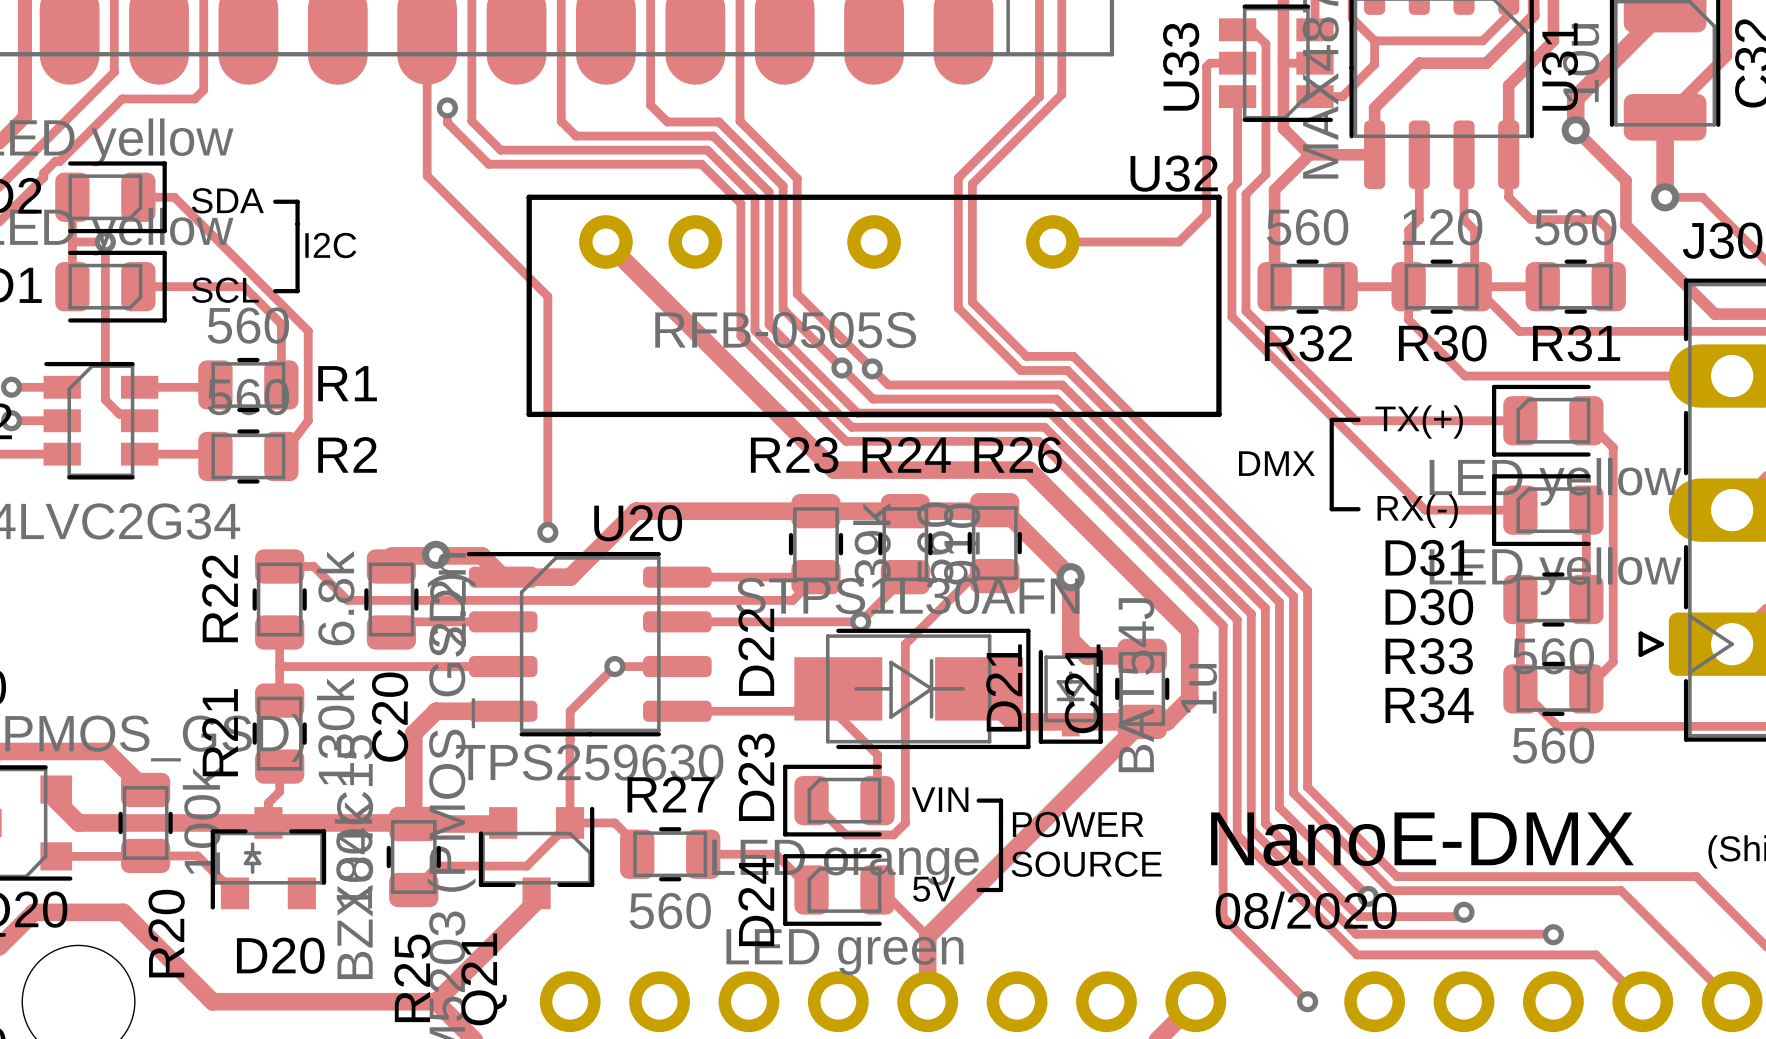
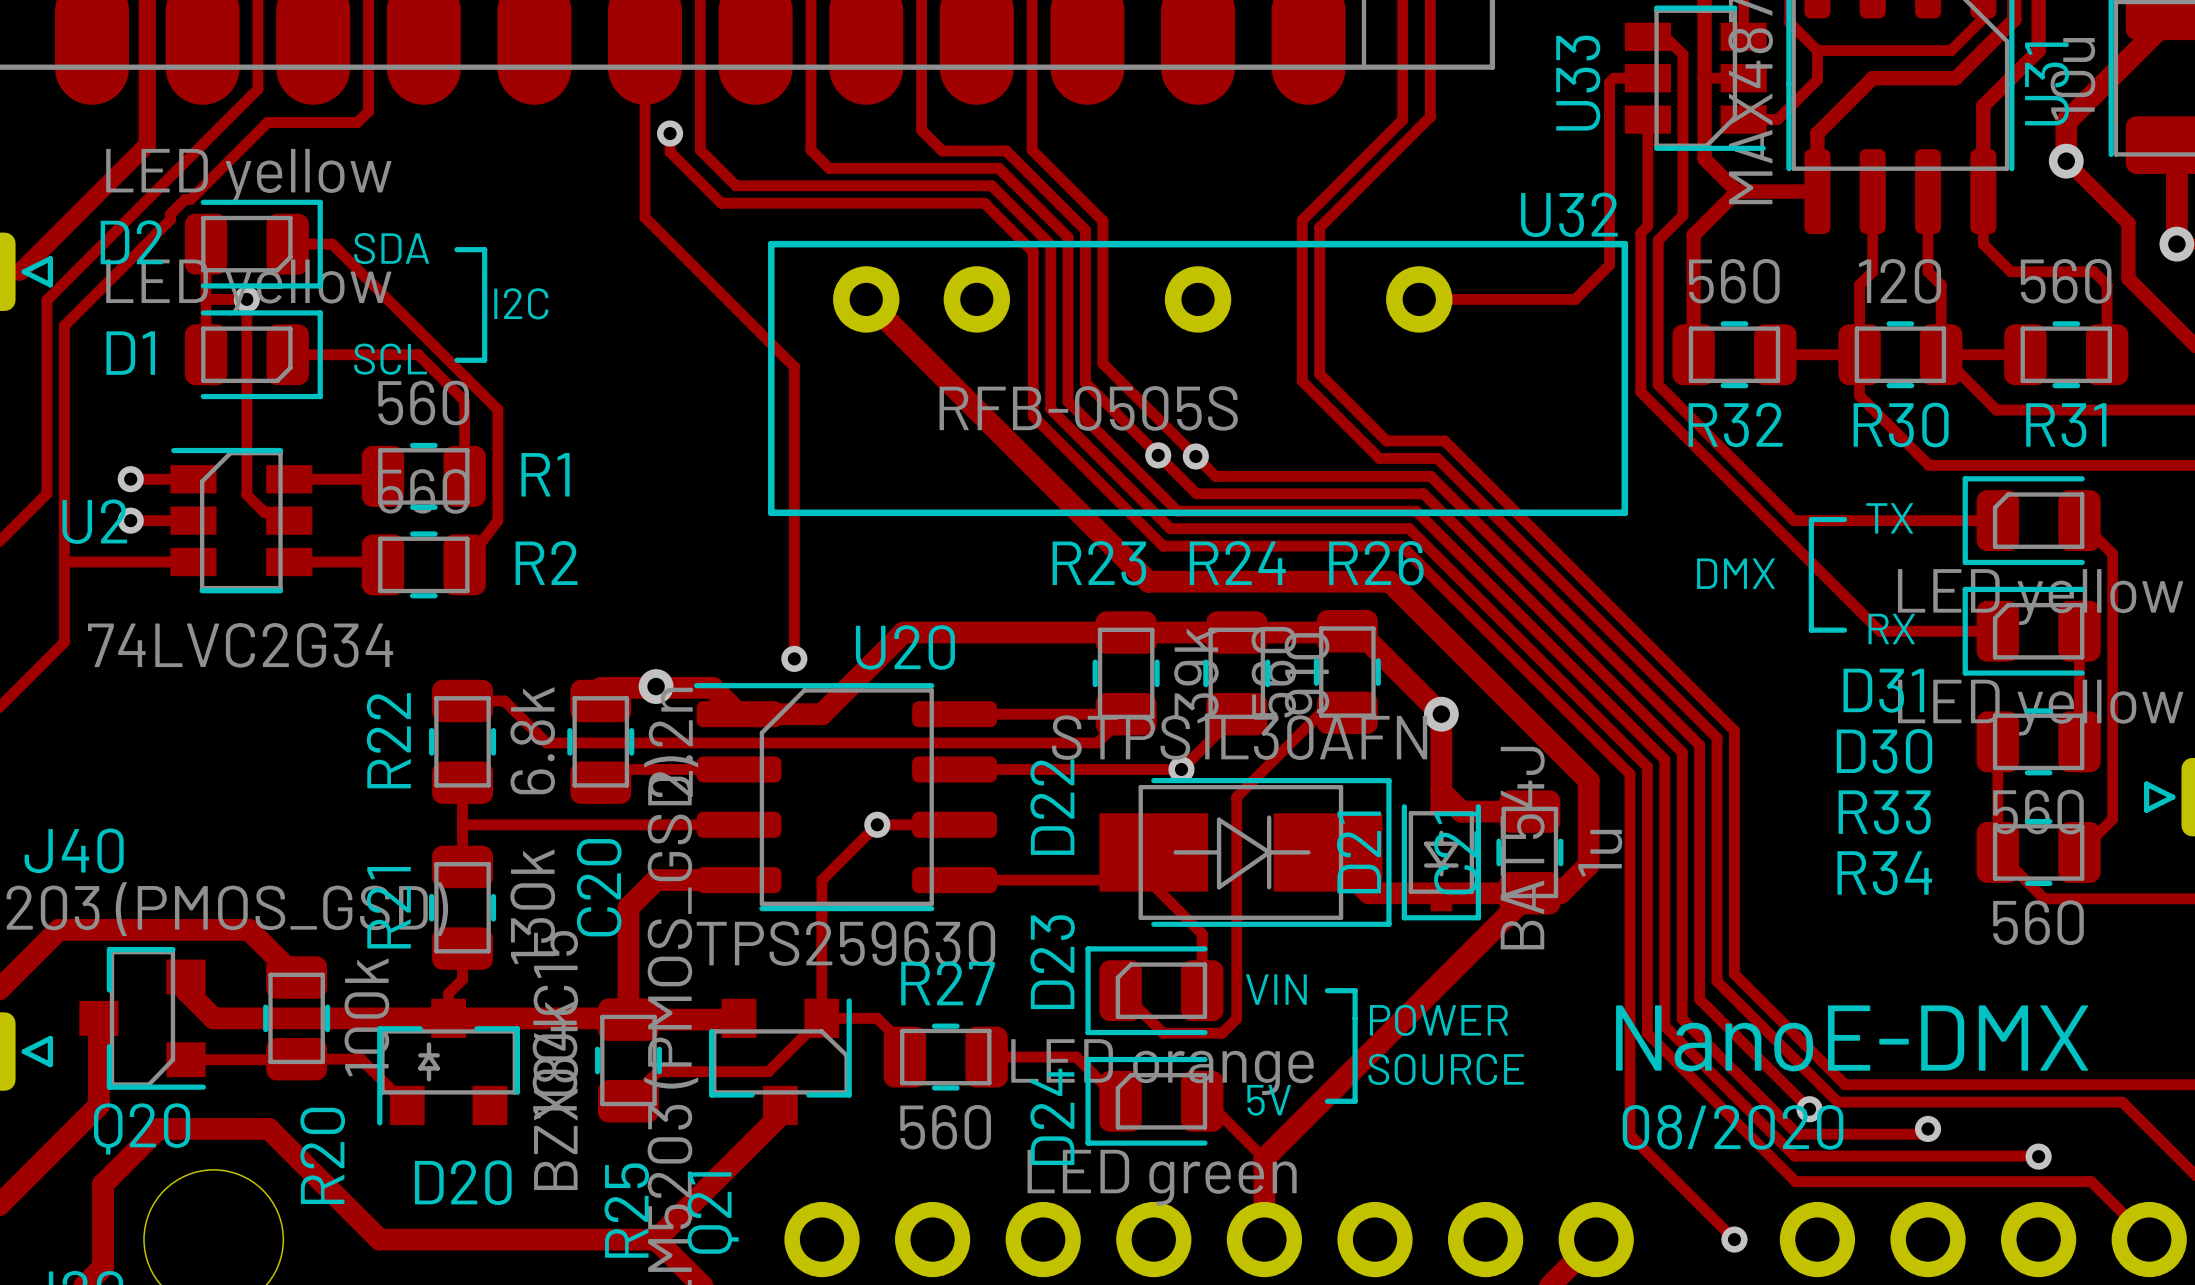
text: none -> TX (1889, 518)
line: (1331, 419) (1358, 419) -> (1811, 519) (1844, 519)
line: (1331, 420) (1331, 509) (1358, 509) -> (1811, 520) (1811, 630) (1844, 630)
text: TX(+) (1419, 421) -> none
text position: DMX (1276, 463) -> DMX (1736, 573)
text: none -> RX (1891, 629)
text: RX(-) (1417, 511) -> none

